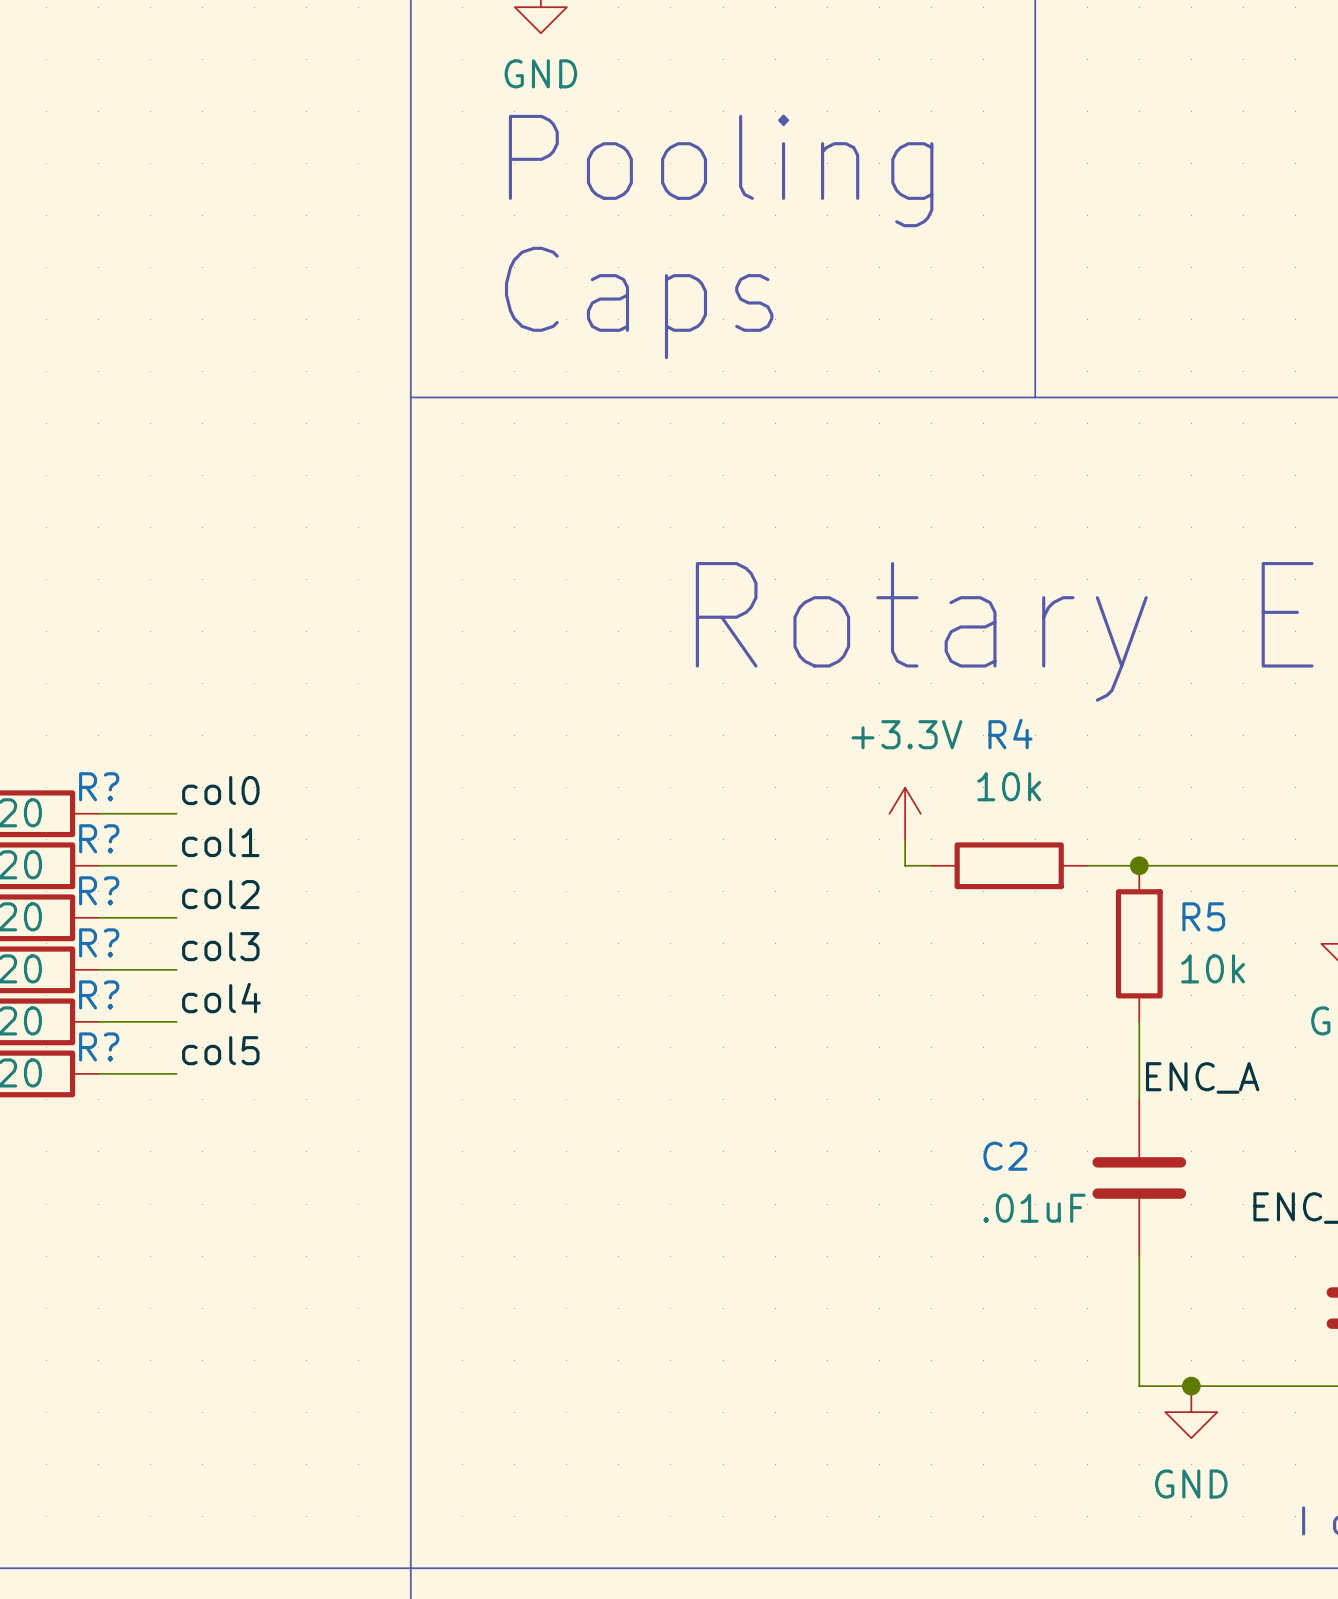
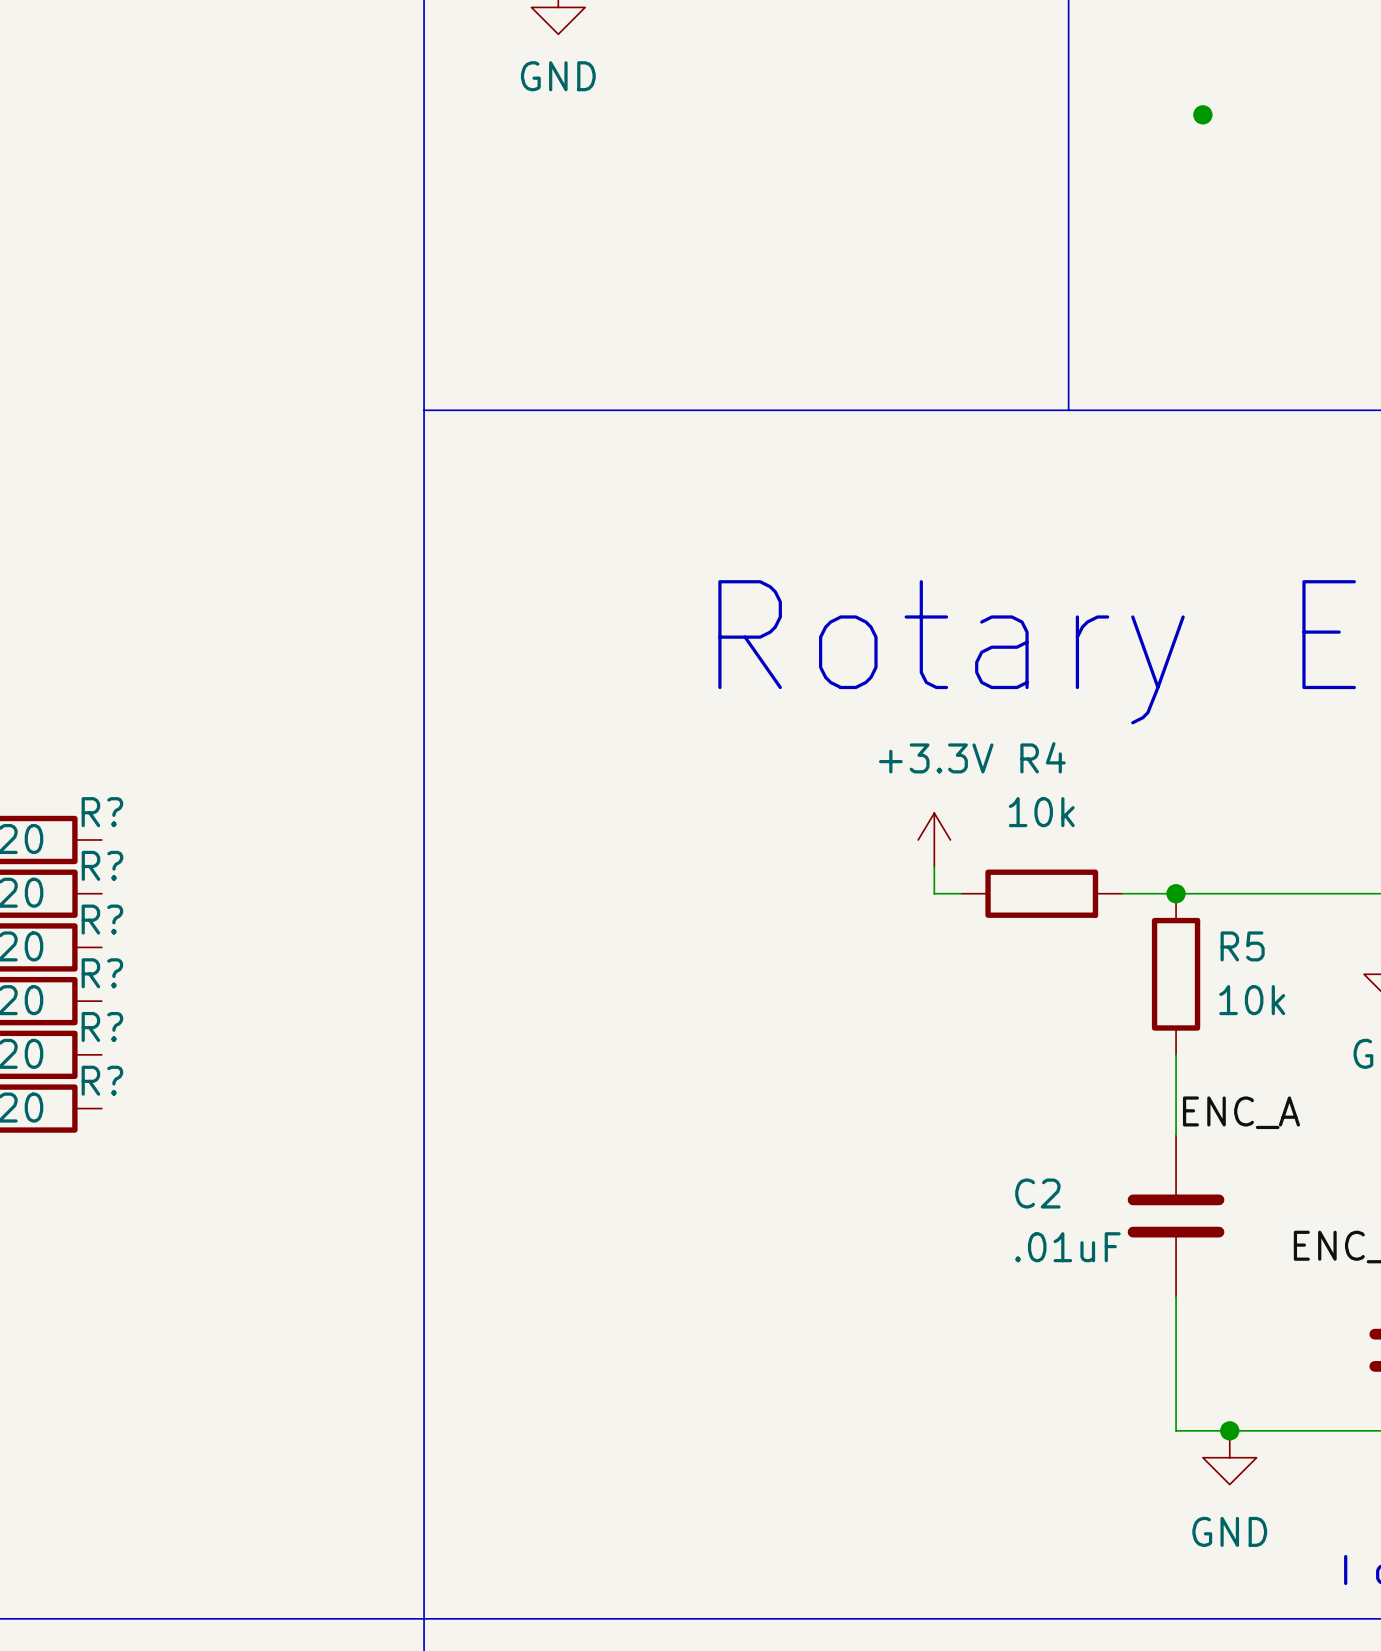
junction: none -> (1202, 114)
text: Pooling (721, 171) -> none
text: Caps (639, 302) -> none
label: col0 (220, 790) -> none
wire: (98, 813) (176, 813) -> none
label: col1 (220, 842) -> none
wire: (98, 865) (176, 865) -> none
label: col2 (220, 894) -> none
wire: (98, 917) (176, 917) -> none
label: col3 (220, 946) -> none
wire: (98, 969) (176, 969) -> none
label: col4 (221, 998) -> none
wire: (98, 1021) (176, 1021) -> none
label: col5 (220, 1050) -> none
wire: (98, 1073) (176, 1073) -> none

